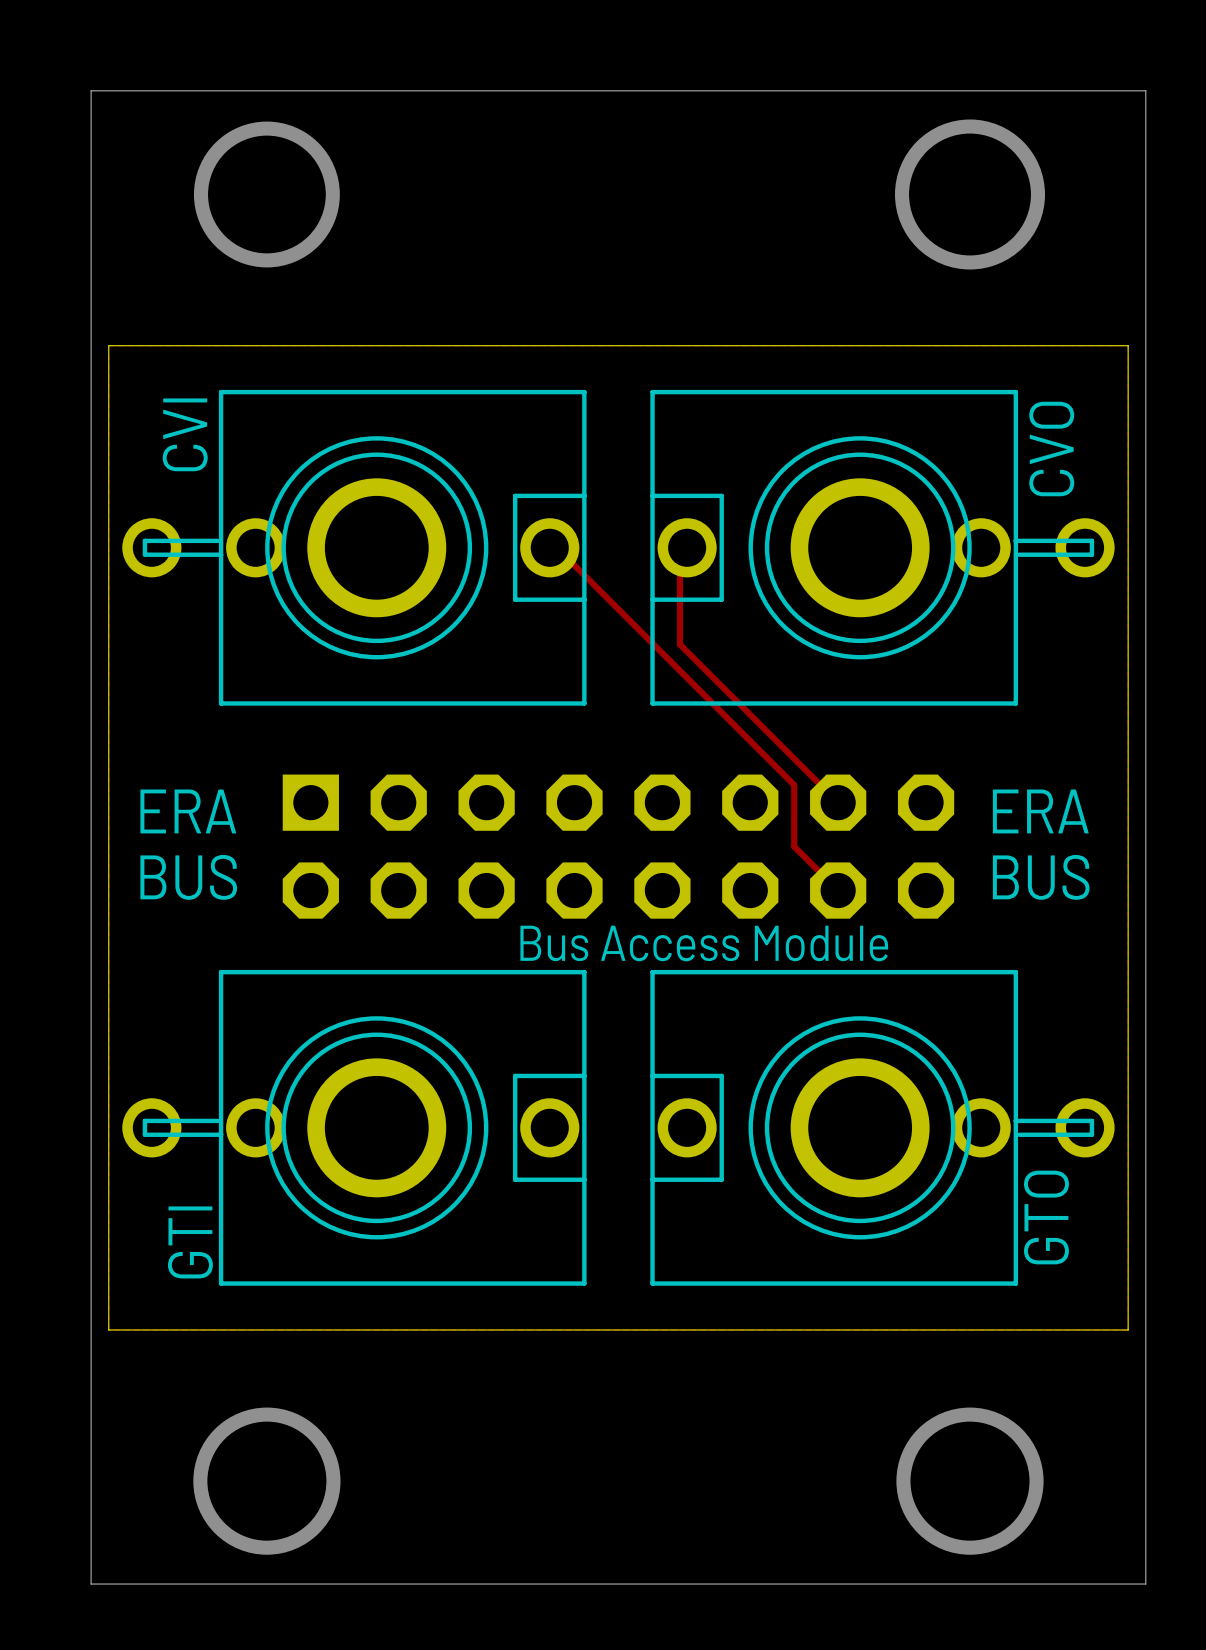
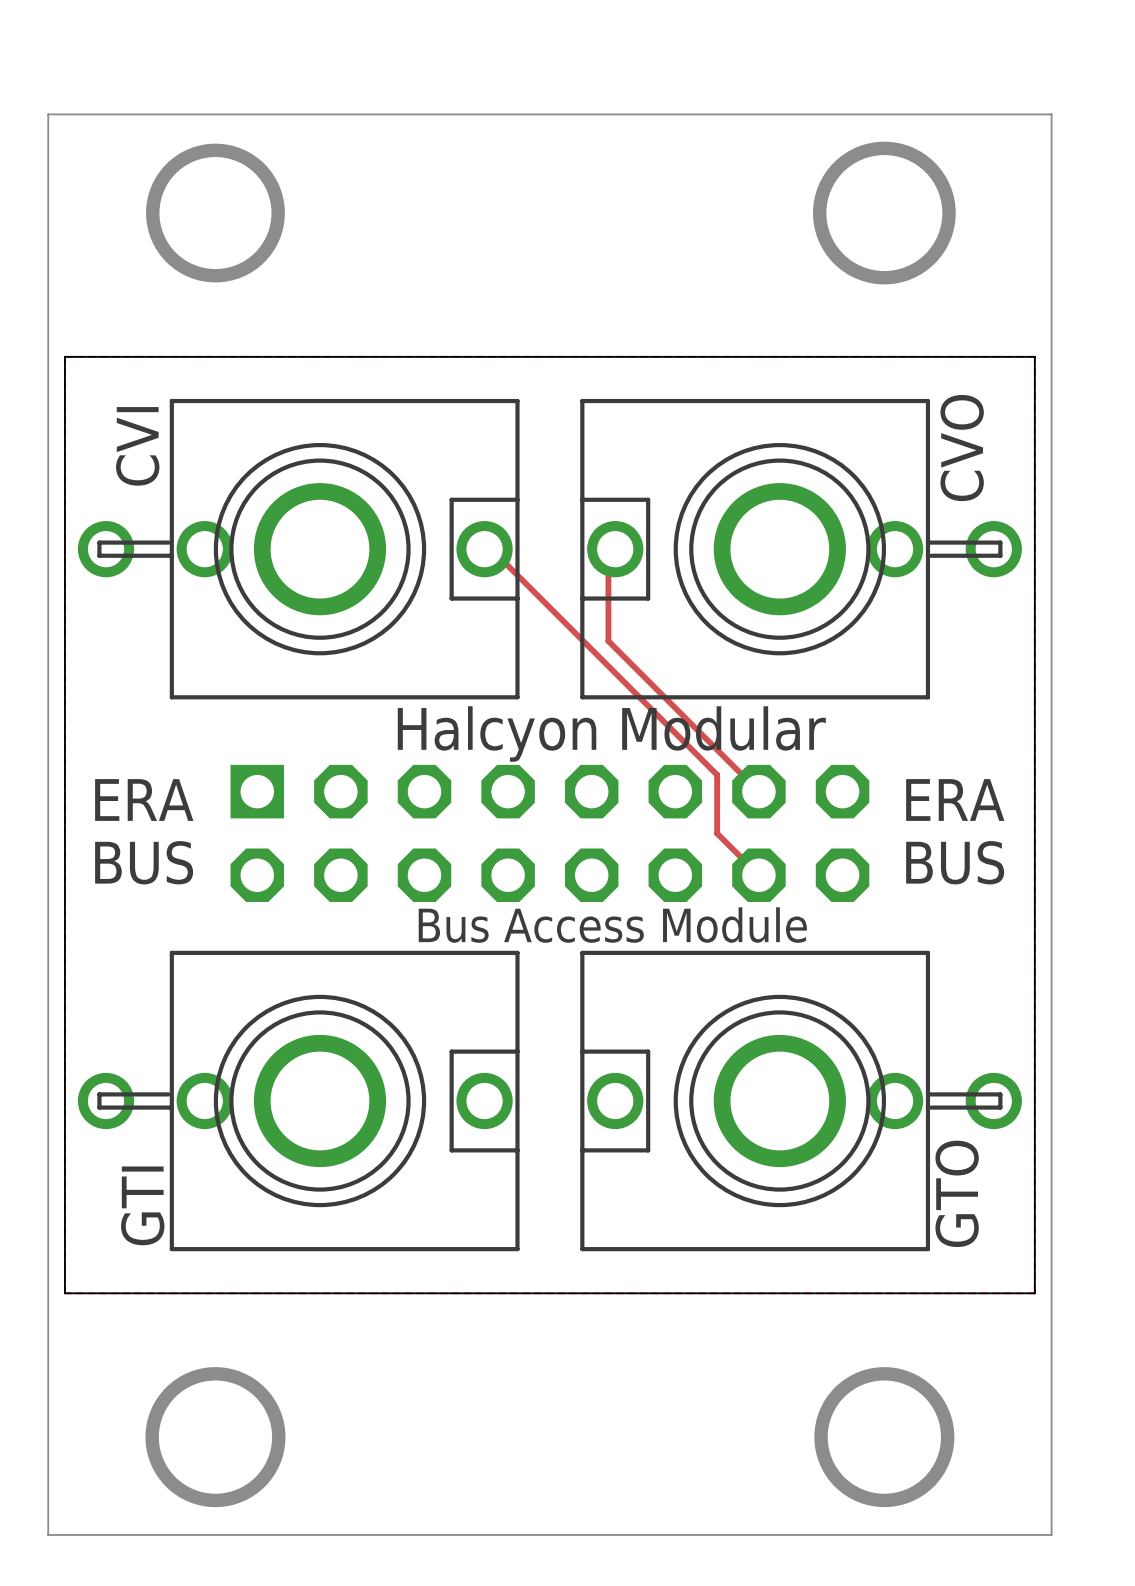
text: none -> Halcyon Modular (611, 734)

